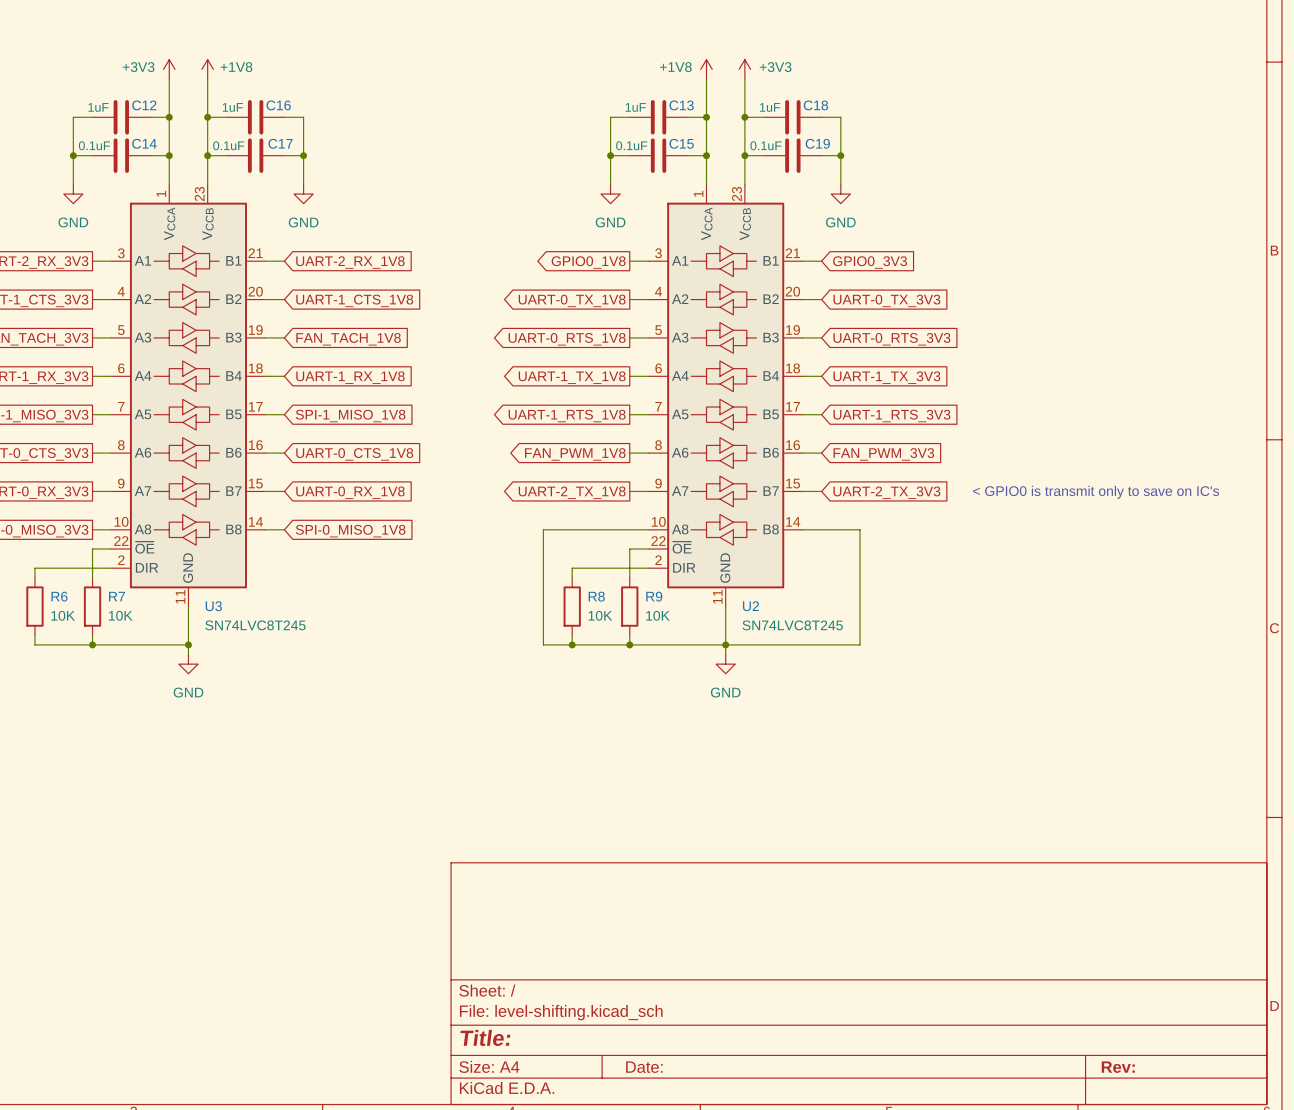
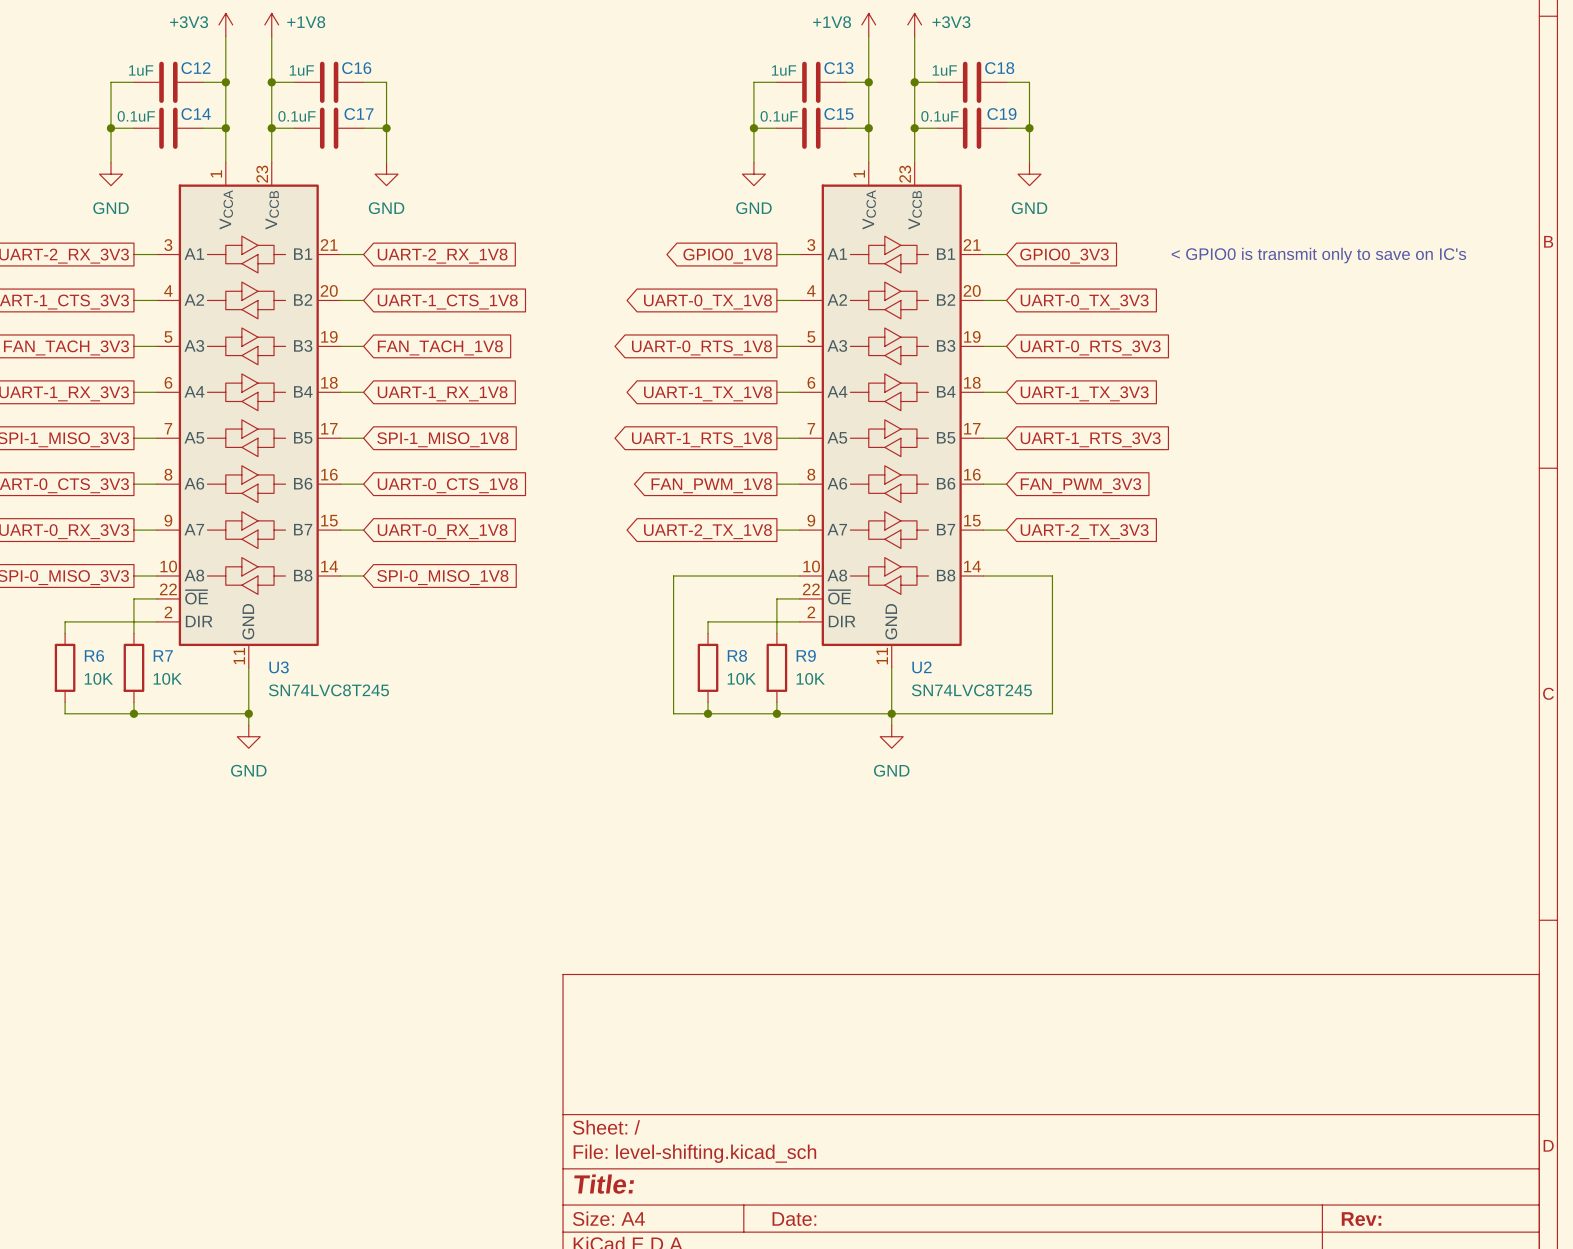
text: none -> < GPIO0 is transmit only to save on IC's (1318, 255)
text: < GPIO0 is transmit only to save on IC's (1096, 492) -> none

